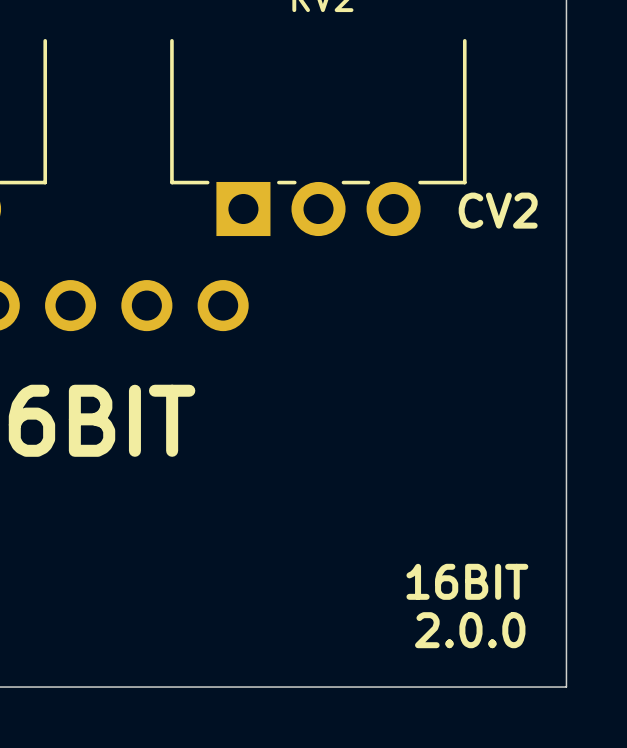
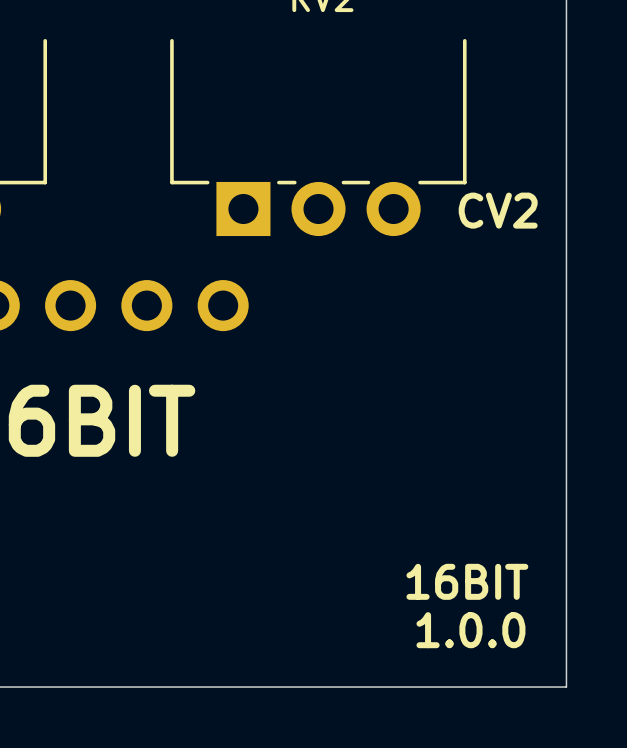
text: 2.0.0 (470, 630) -> 1.0.0 (470, 630)

